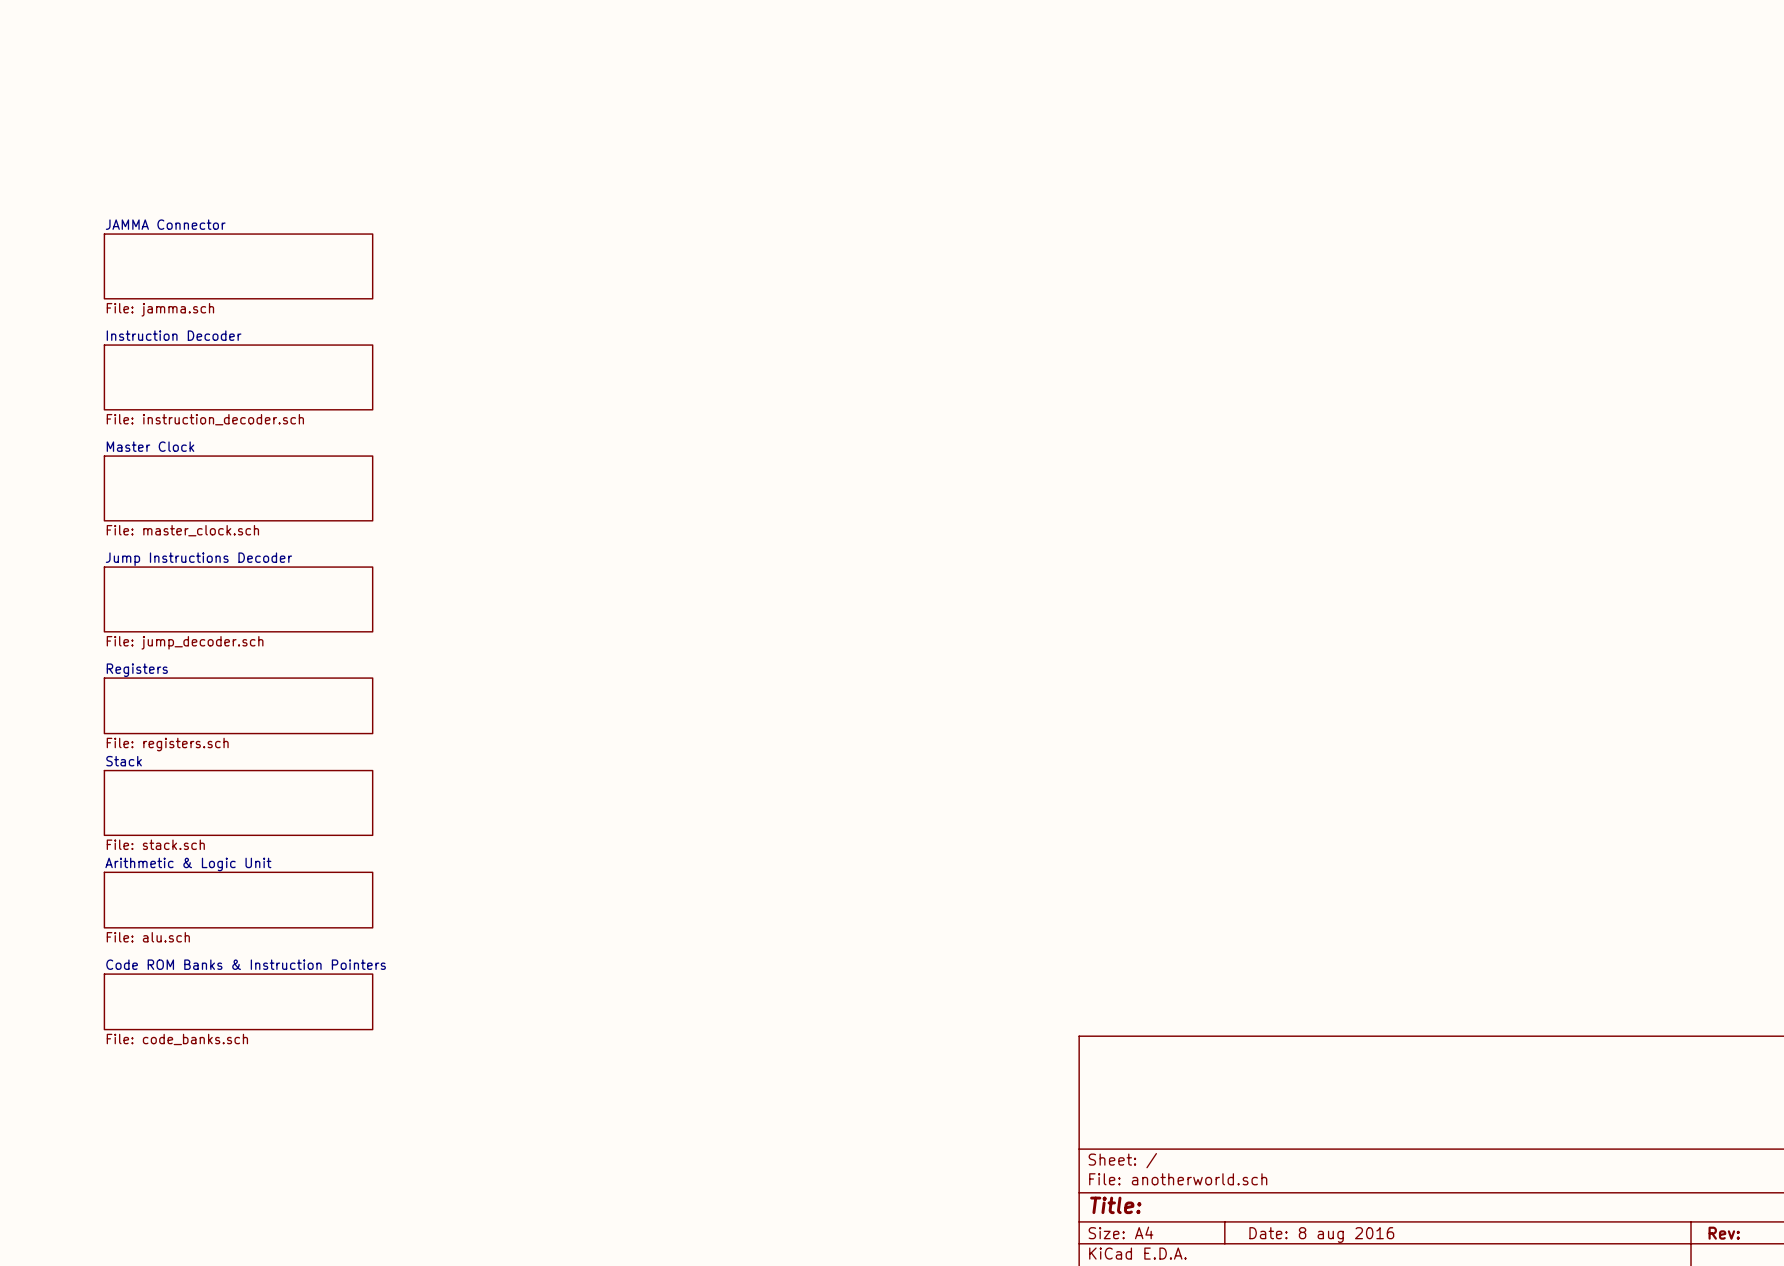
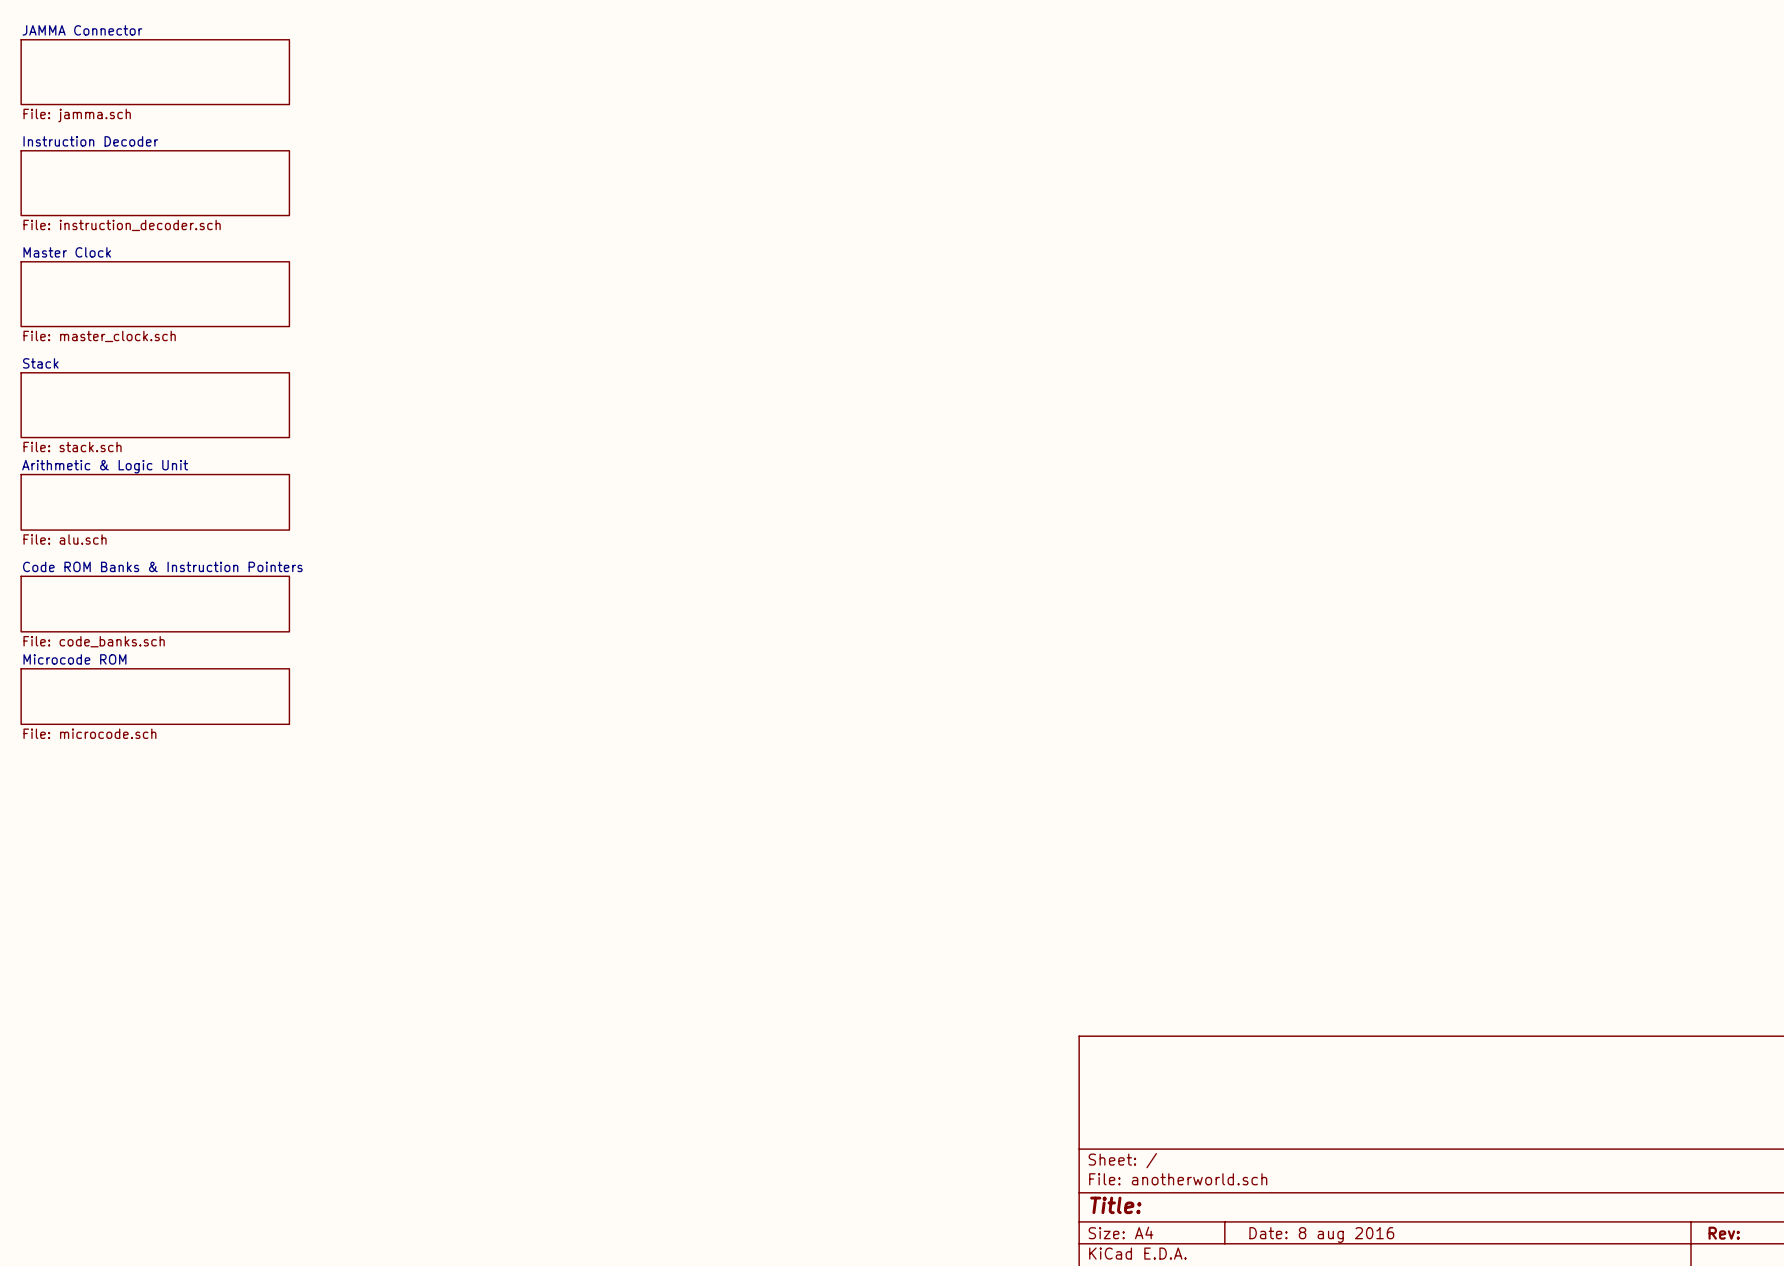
sheet JAMMA Connector: none -> File: jamma.sch (155, 72)
sheet Instruction Decoder: none -> File: instruction_decoder.sch (155, 183)
sheet JAMMA Connector: File: jamma.sch (238, 266) -> none
sheet Master Clock: none -> File: master_clock.sch (155, 294)
sheet Instruction Decoder: File: instruction_decoder.sch (238, 377) -> none
sheet Stack: none -> File: stack.sch (155, 405)
sheet Master Clock: File: master_clock.sch (238, 488) -> none
sheet Arithmetic & Logic Unit: none -> File: alu.sch (155, 502)
sheet Jump Instructions Decoder: File: jump_decoder.sch (238, 599) -> none
sheet Code ROM Banks & Instruction Pointers: none -> File: code_banks.sch (155, 604)
sheet Microcode ROM: none -> File: microcode.sch (155, 696)
sheet Registers: File: registers.sch (238, 705) -> none
sheet Stack: File: stack.sch (238, 802) -> none
sheet Arithmetic & Logic Unit: File: alu.sch (238, 900) -> none
sheet Code ROM Banks & Instruction Pointers: File: code_banks.sch (238, 1001) -> none

